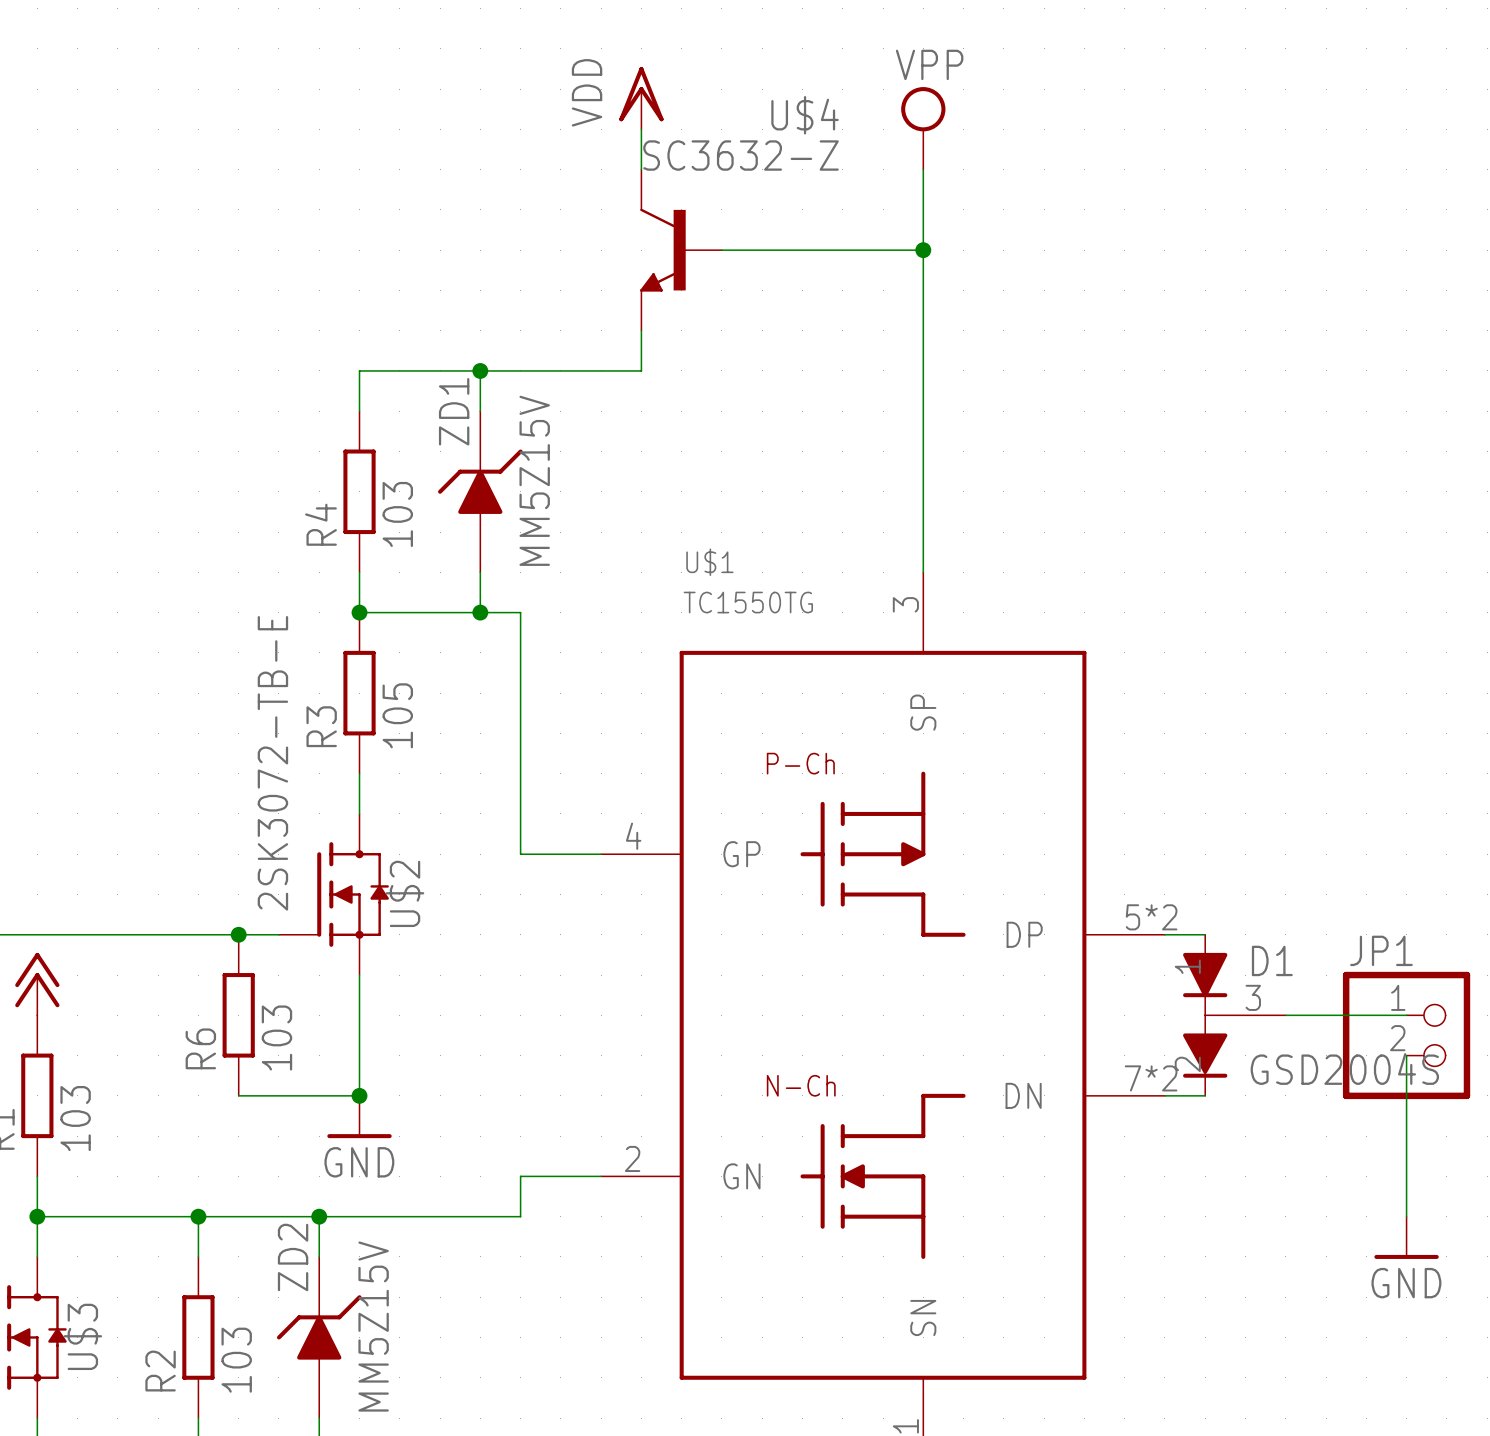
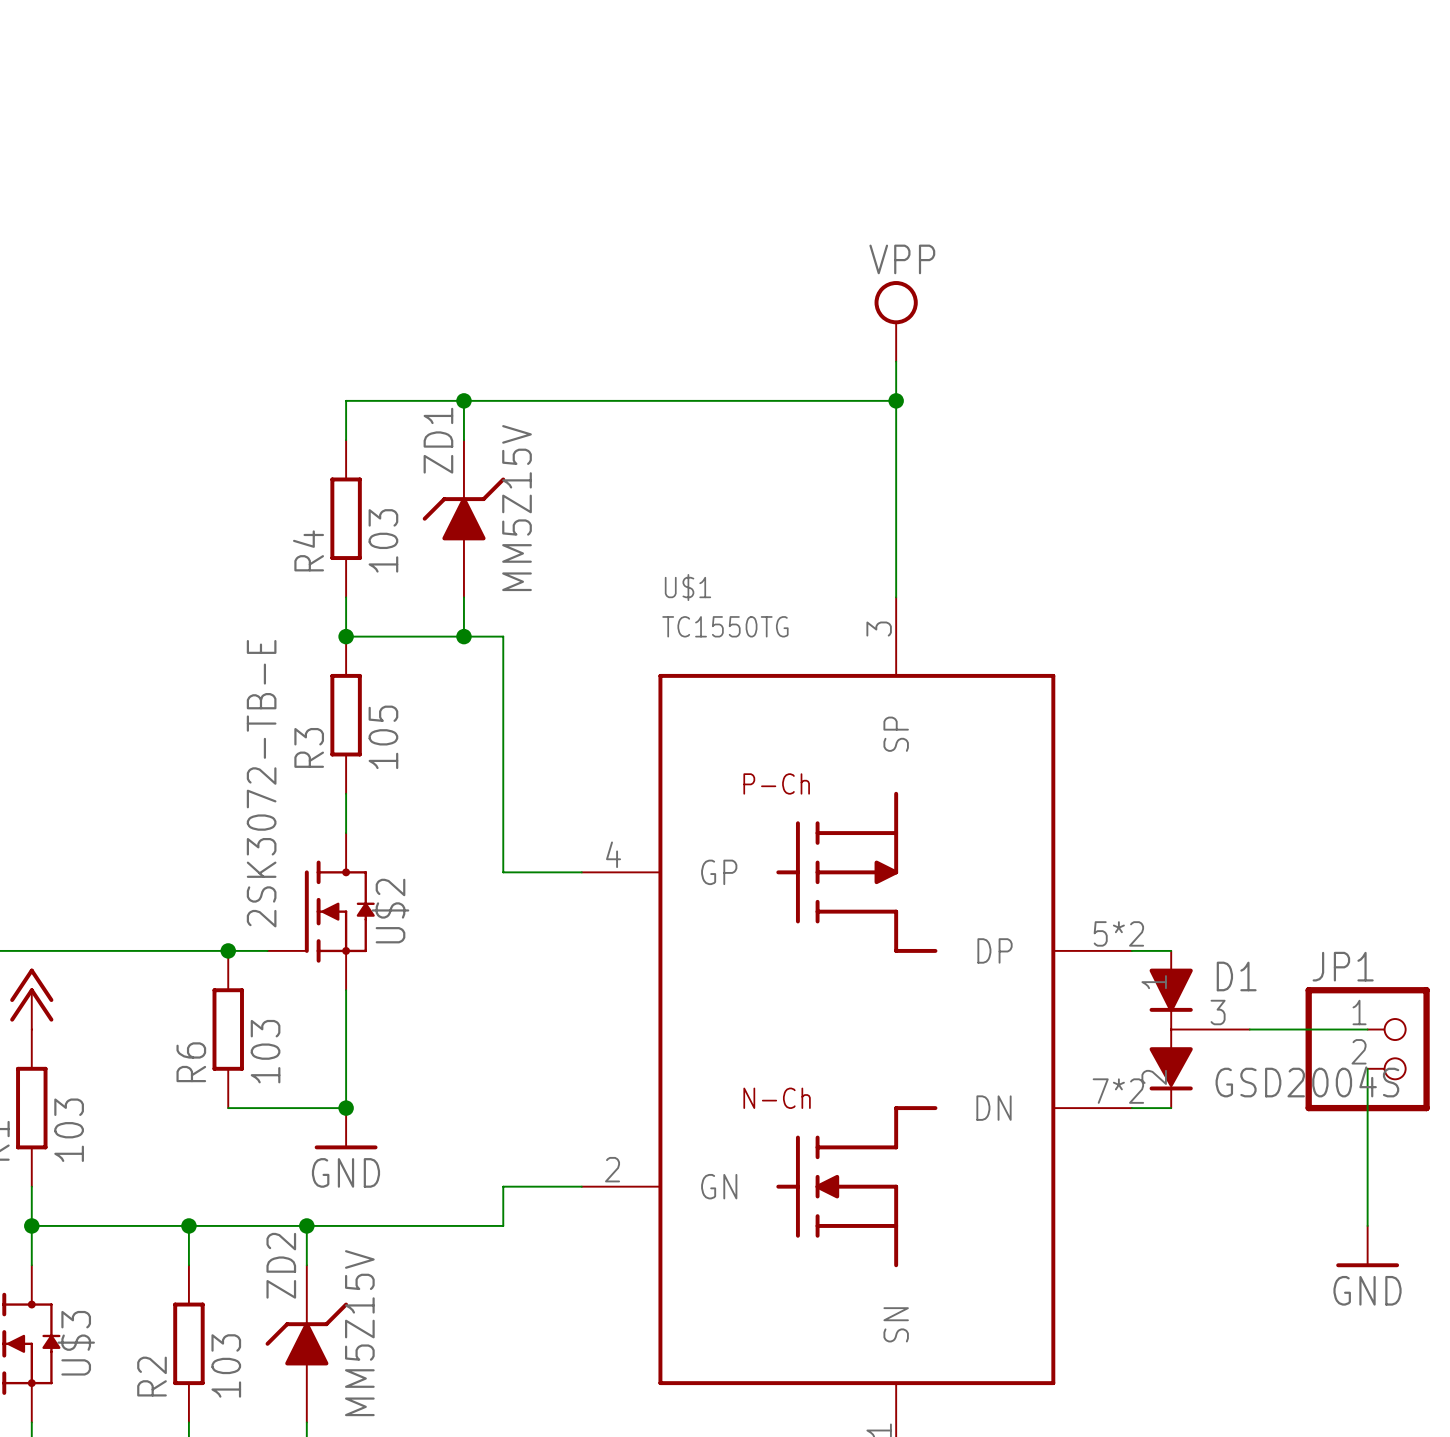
power symbol: VDD (641, 98) -> none
power symbol position: VPP (923, 128) -> VPP (896, 321)
wire: (641, 129) (641, 169) -> none
wire: (923, 169) (923, 330) -> none
U$4: SC3632-Z (681, 250) -> none
wire: (721, 250) (923, 250) -> none
junction: (923, 250) -> none
wire: (641, 330) (641, 370) -> (896, 400) (621, 400)
junction: none -> (896, 400)

